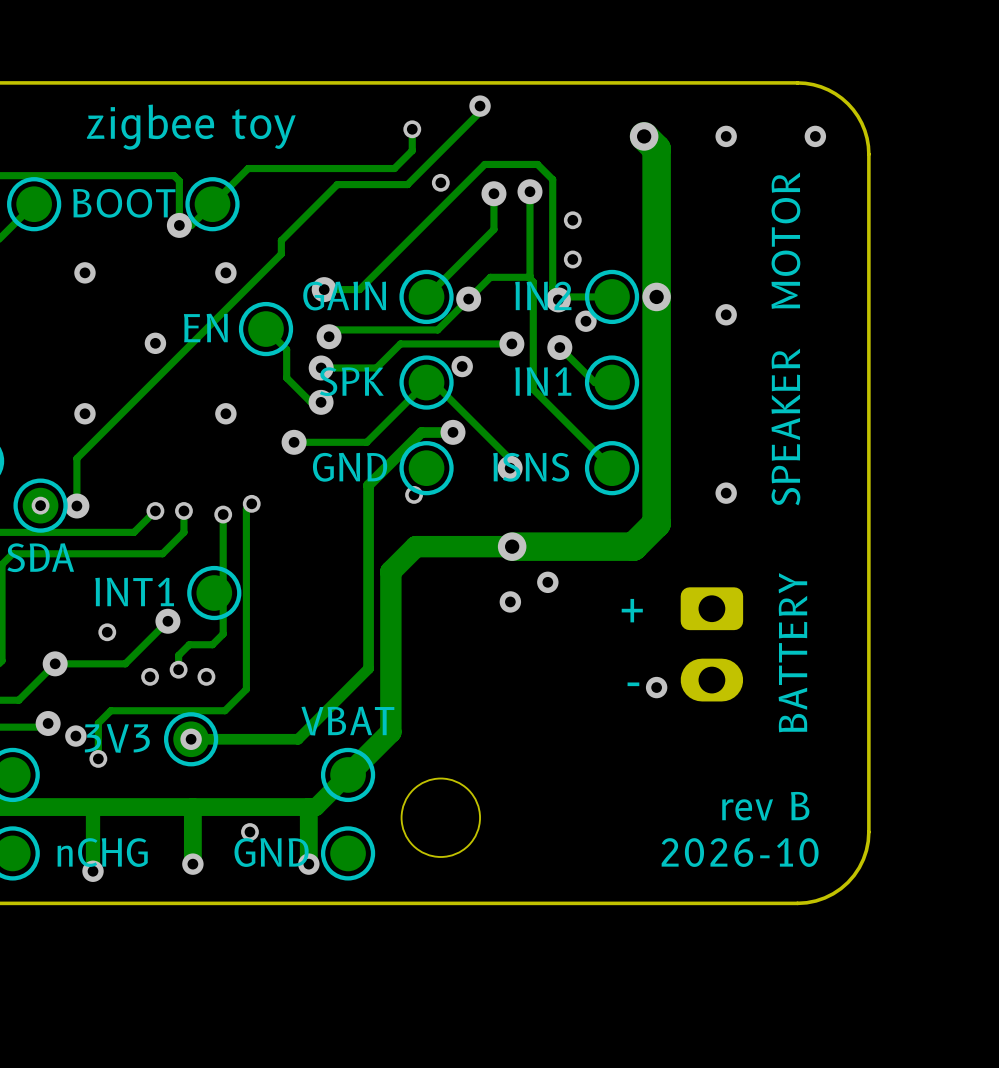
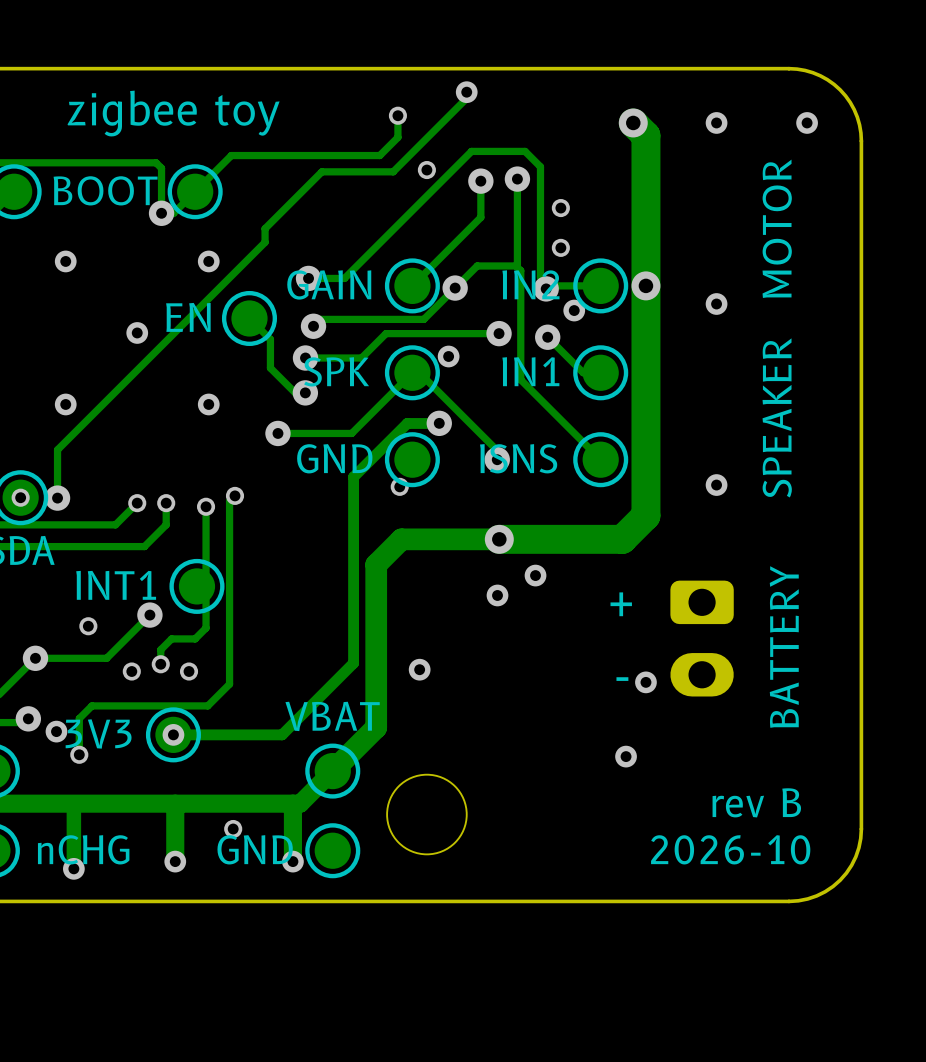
via: none -> (419, 669)
via: none -> (626, 756)

